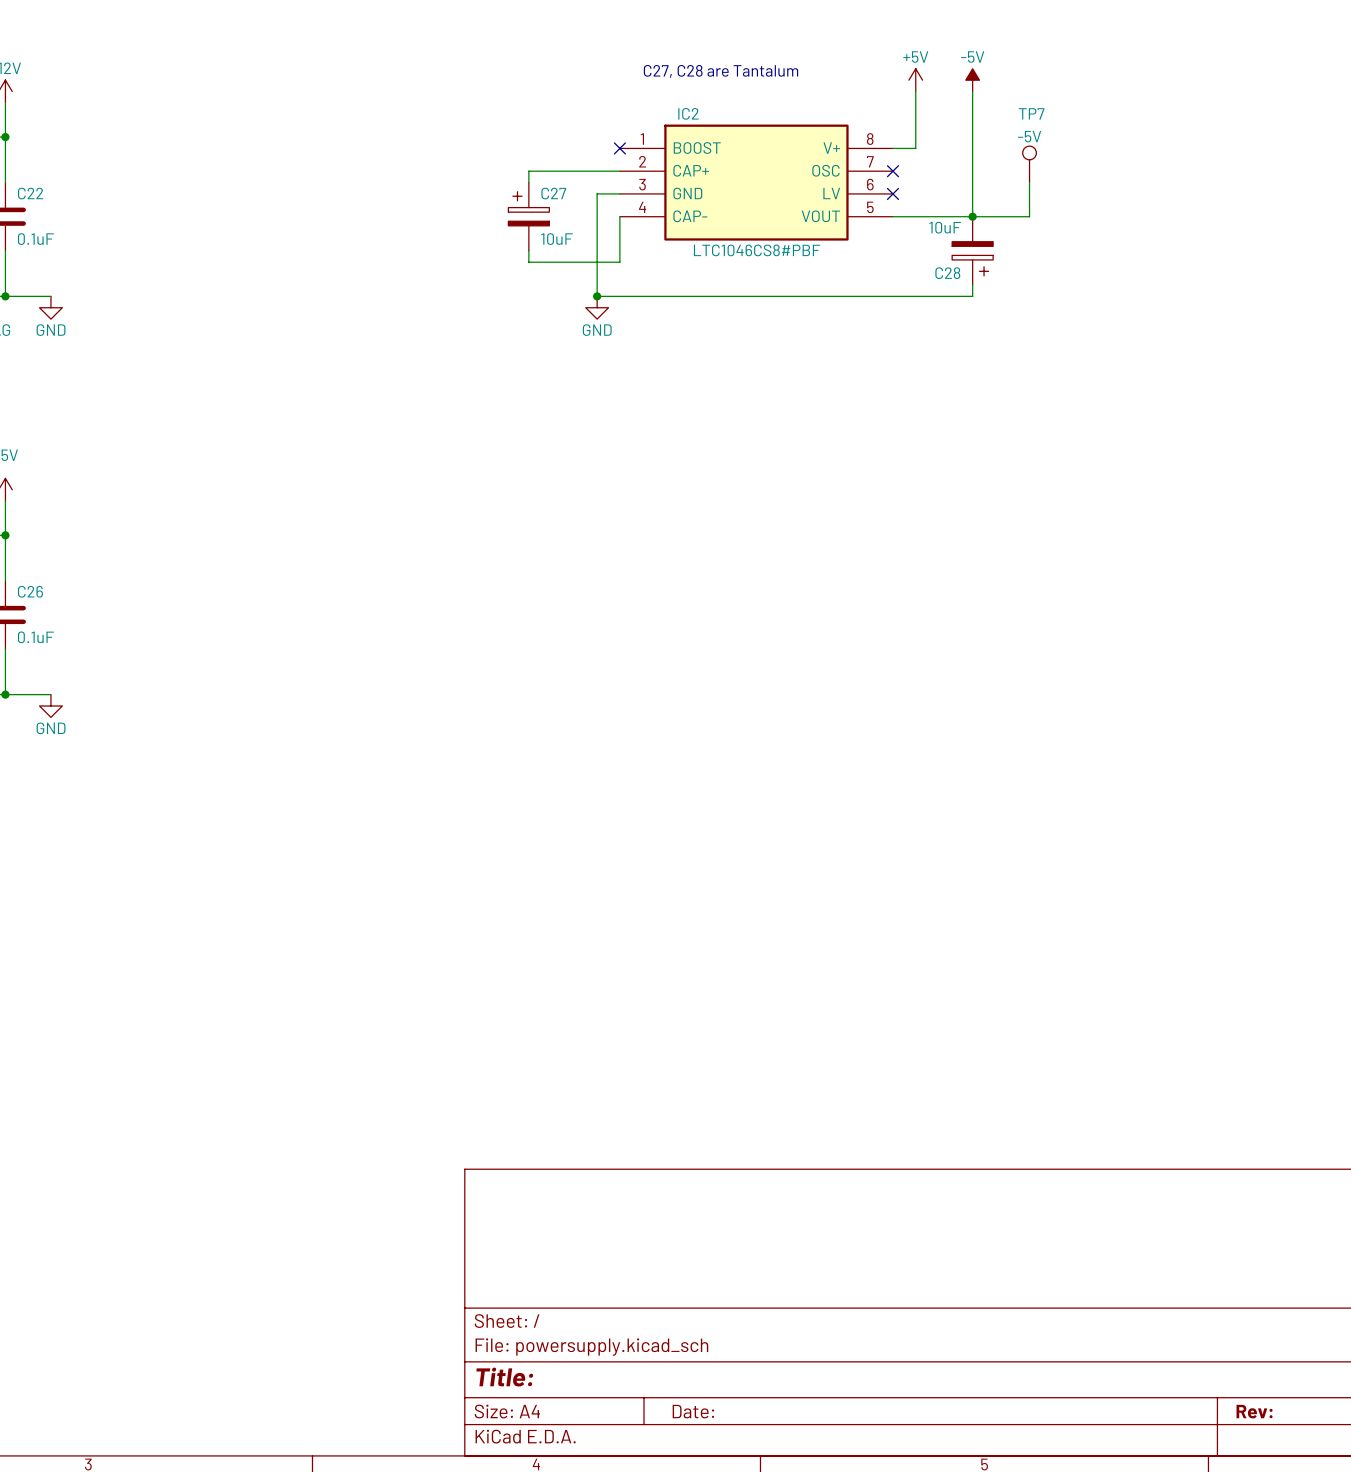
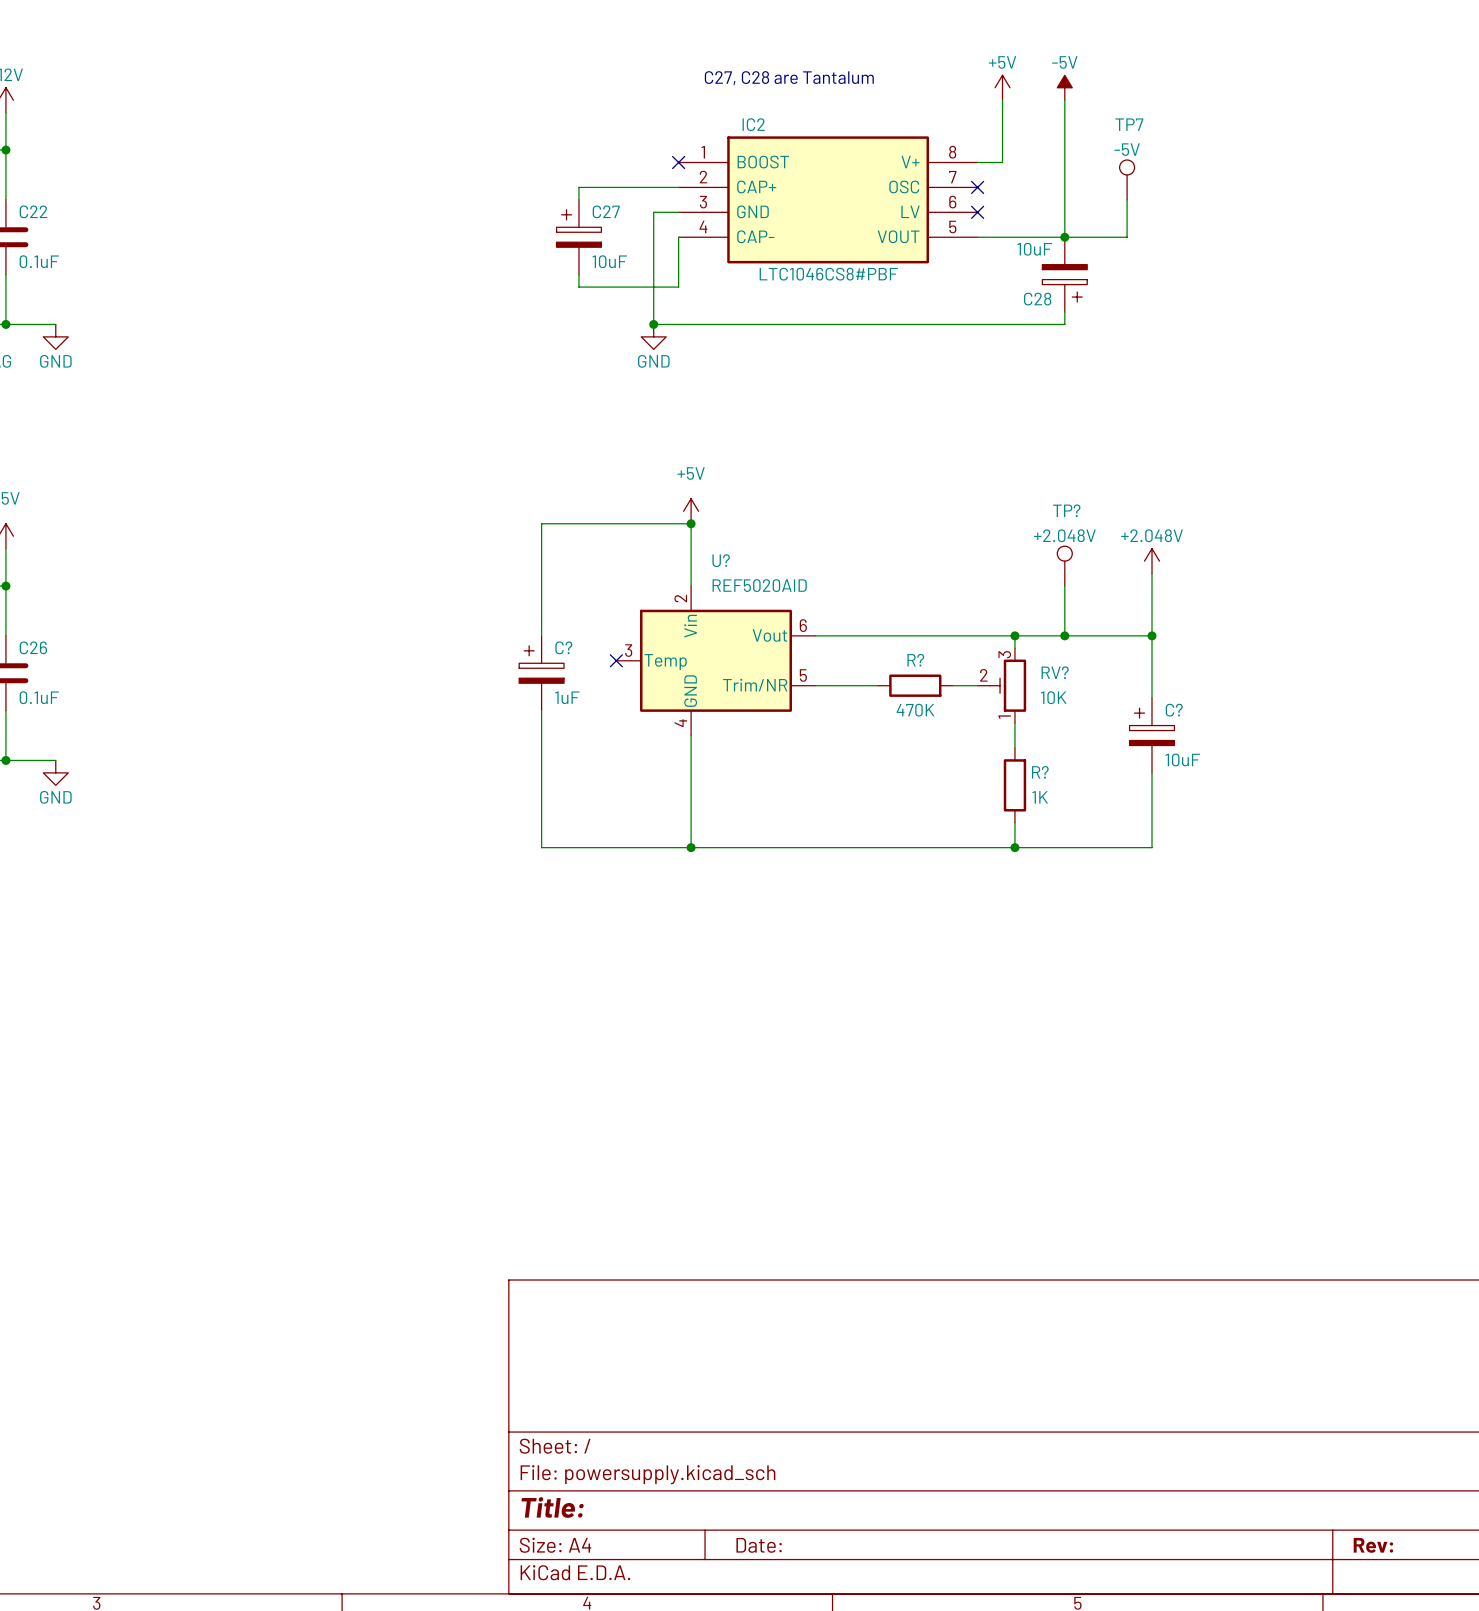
power symbol: none -> +5V (691, 511)
junction: none -> (691, 523)
power symbol: none -> +2.048V (1152, 561)
TP?: none -> +2.048V (1064, 566)
wire: none -> (1152, 573) (1152, 698)
wire: none -> (691, 586) (691, 523) (541, 523) (541, 635)
wire: none -> (1064, 586) (1064, 635)
wire: none -> (815, 635) (1152, 635)
wire: none -> (1014, 635) (1014, 648)
junction: none -> (1014, 635)
junction: none -> (1064, 635)
junction: none -> (1152, 635)
no-connect mark: none -> (616, 660)
U?: none -> REF5020AID (716, 660)
C?: none -> 1uF (541, 673)
wire: none -> (815, 685) (877, 685)
R?: none -> 470K (915, 685)
wire: none -> (952, 685) (977, 685)
RV?: none -> 10K (1001, 685)
wire: none -> (541, 710) (541, 847) (1152, 847) (1152, 772)
wire: none -> (1014, 723) (1014, 747)
wire: none -> (691, 735) (691, 847)
C?: none -> 10uF (1152, 735)
R?: none -> 1K (1014, 785)
wire: none -> (1014, 822) (1014, 847)
junction: none -> (691, 847)
junction: none -> (1014, 847)

